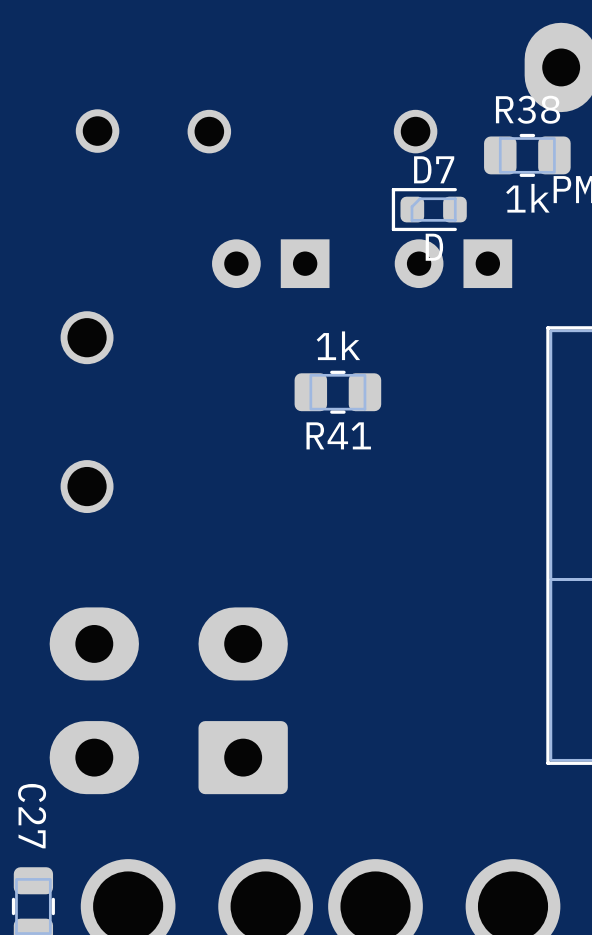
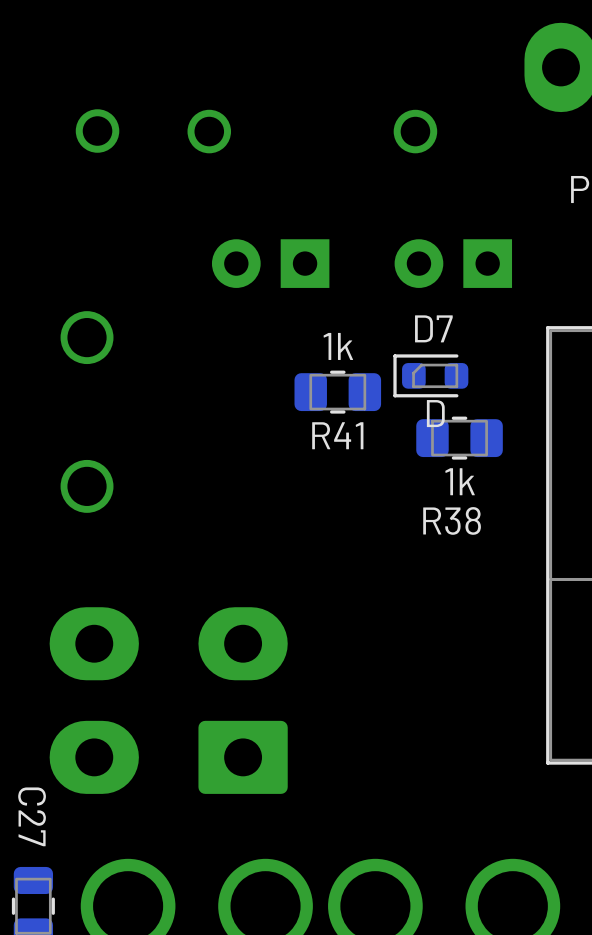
R38 name position: R38 (528, 109) -> R38 (452, 520)
R38 position: (527, 155) -> (459, 438)
D7 name position: D7 (434, 169) -> D7 (433, 328)
D7 position: (429, 209) -> (430, 375)

